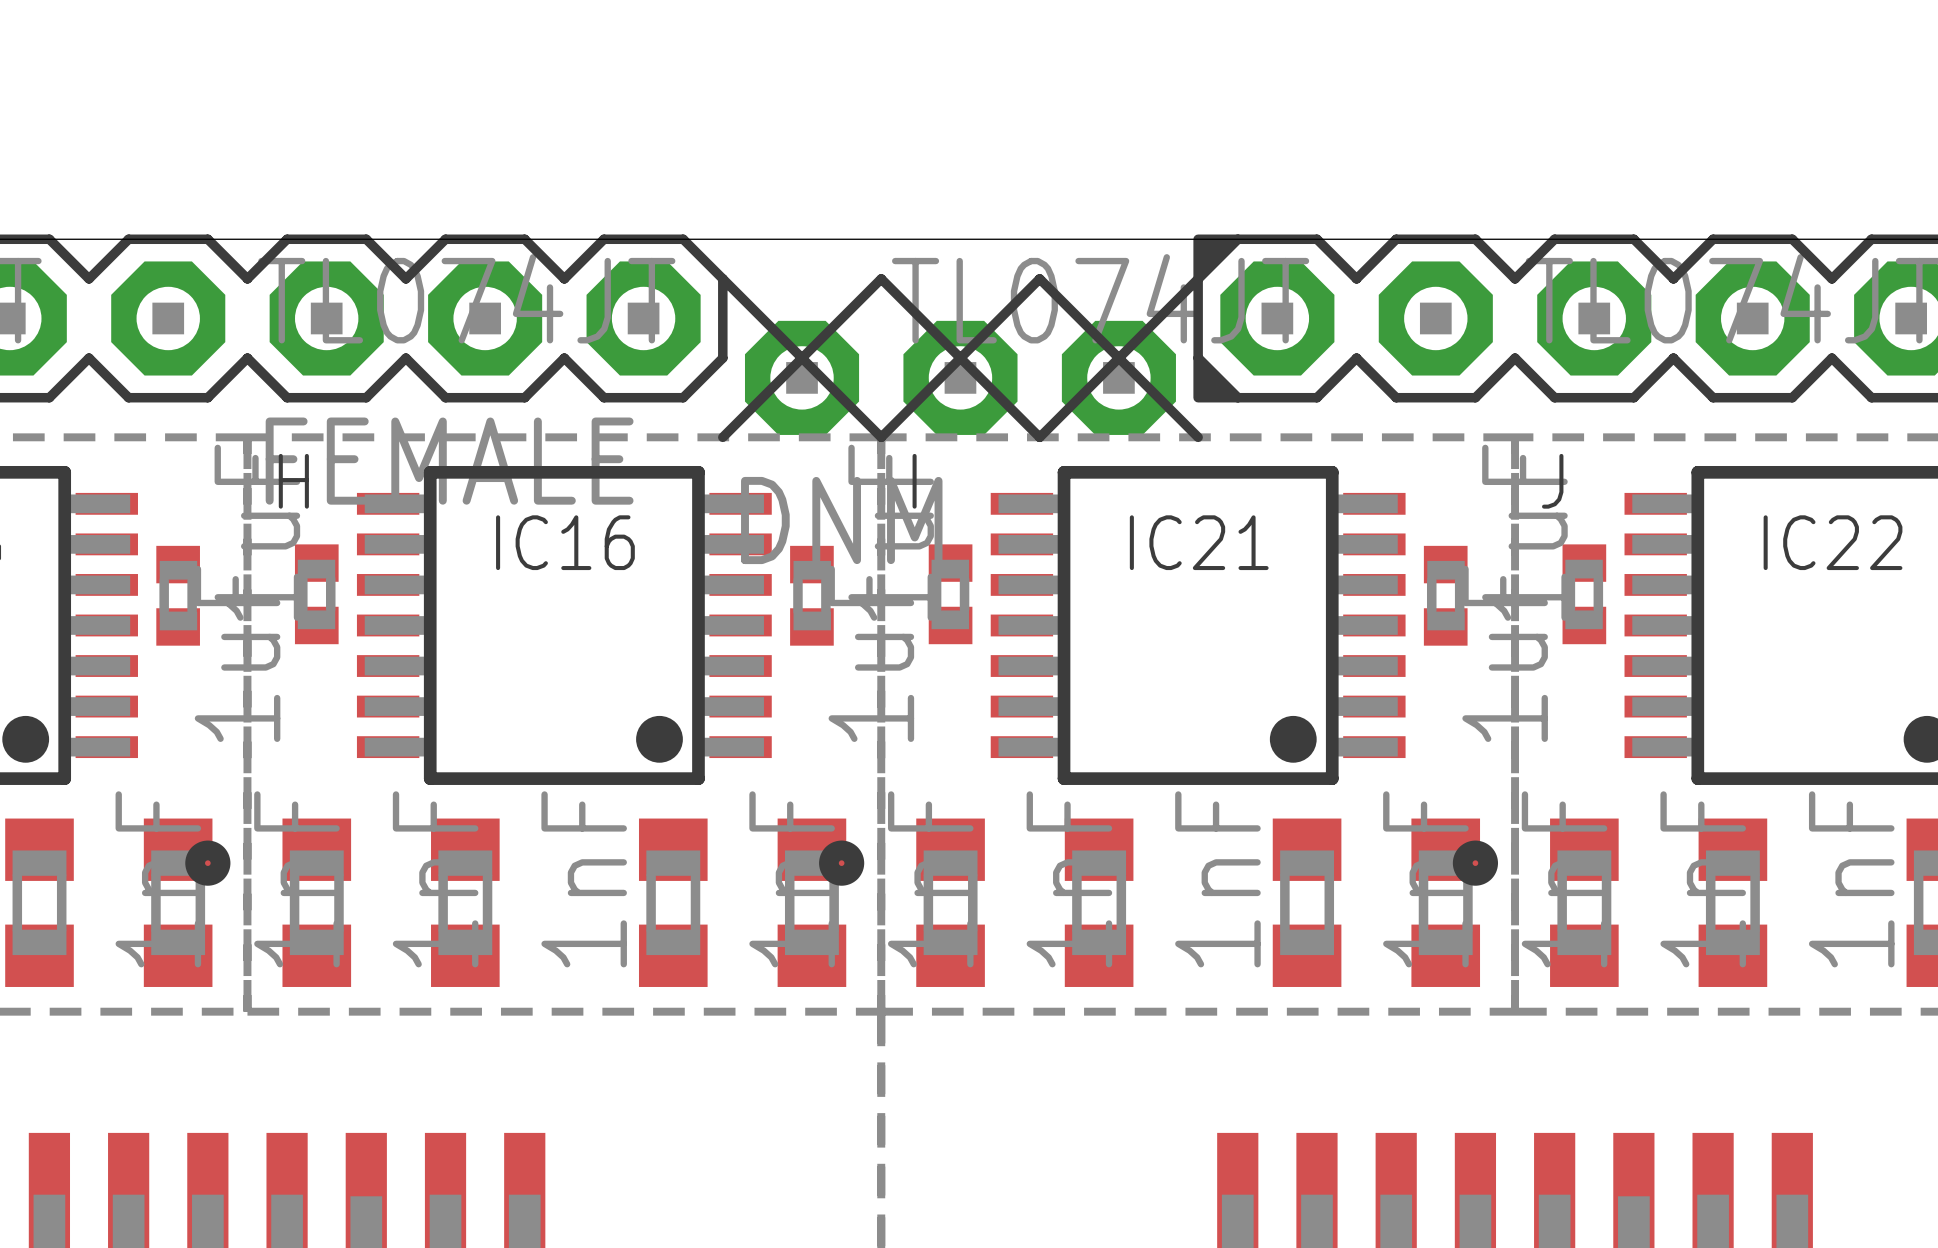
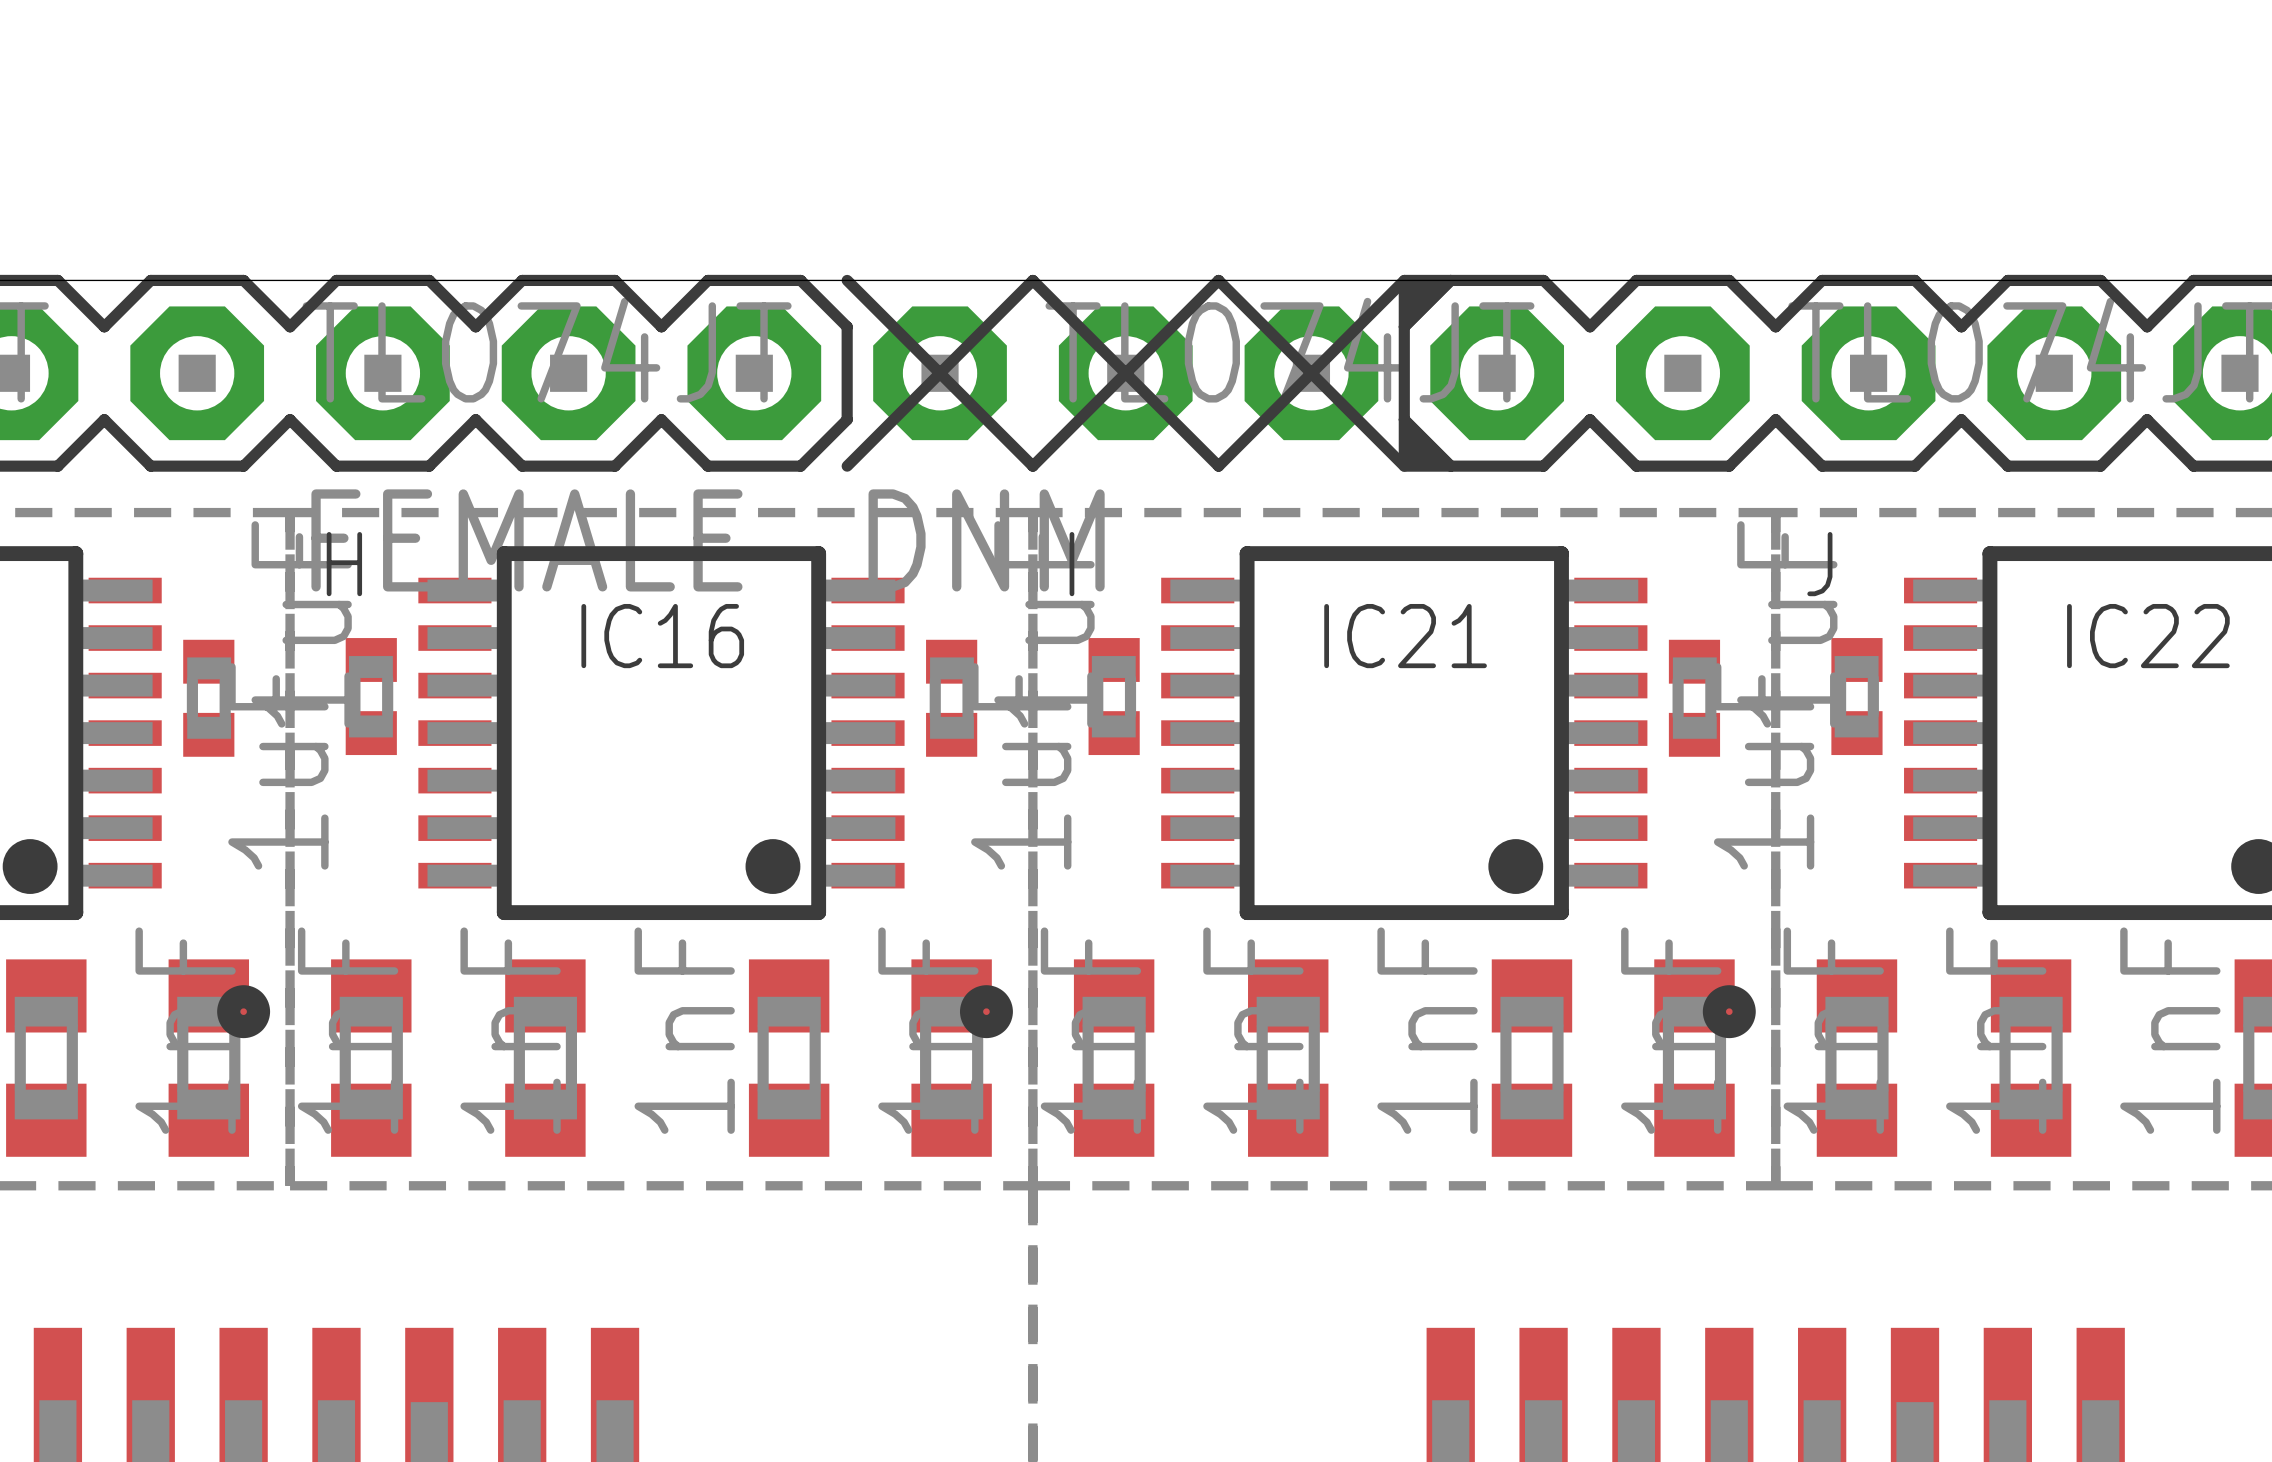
line: (722, 278) (881, 437) (1039, 278) (1198, 437) -> (847, 280) (1032, 466) (1218, 280) (1404, 466)
line: (1198, 278) (1039, 437) (881, 278) (722, 437) -> (1404, 280) (1218, 466) (1032, 280) (847, 466)
part position: (960, 377) -> (1125, 373)

